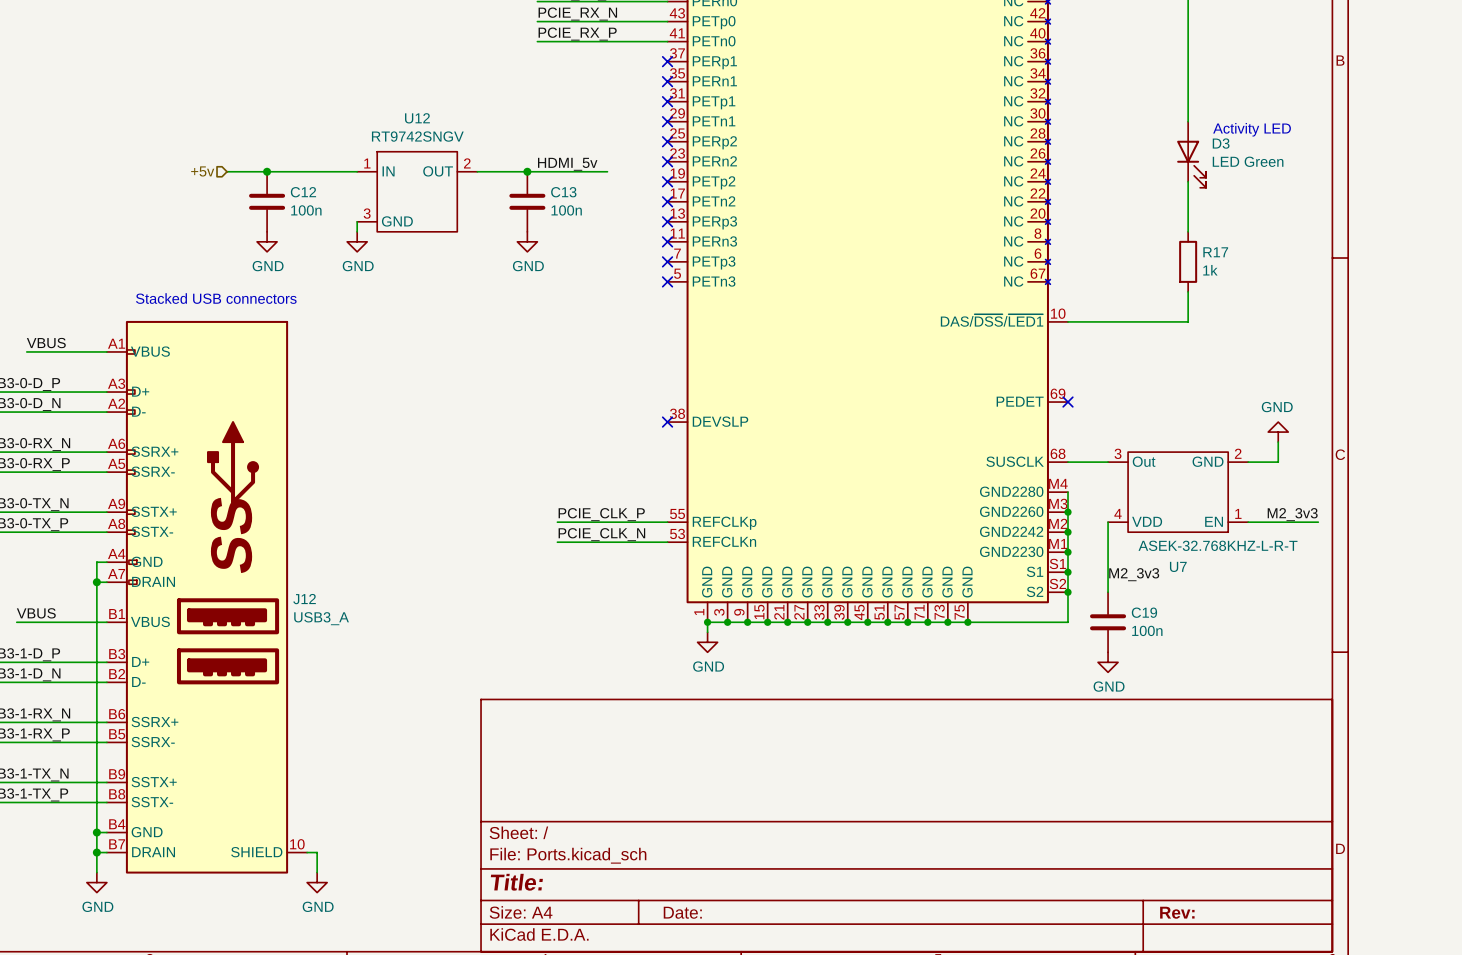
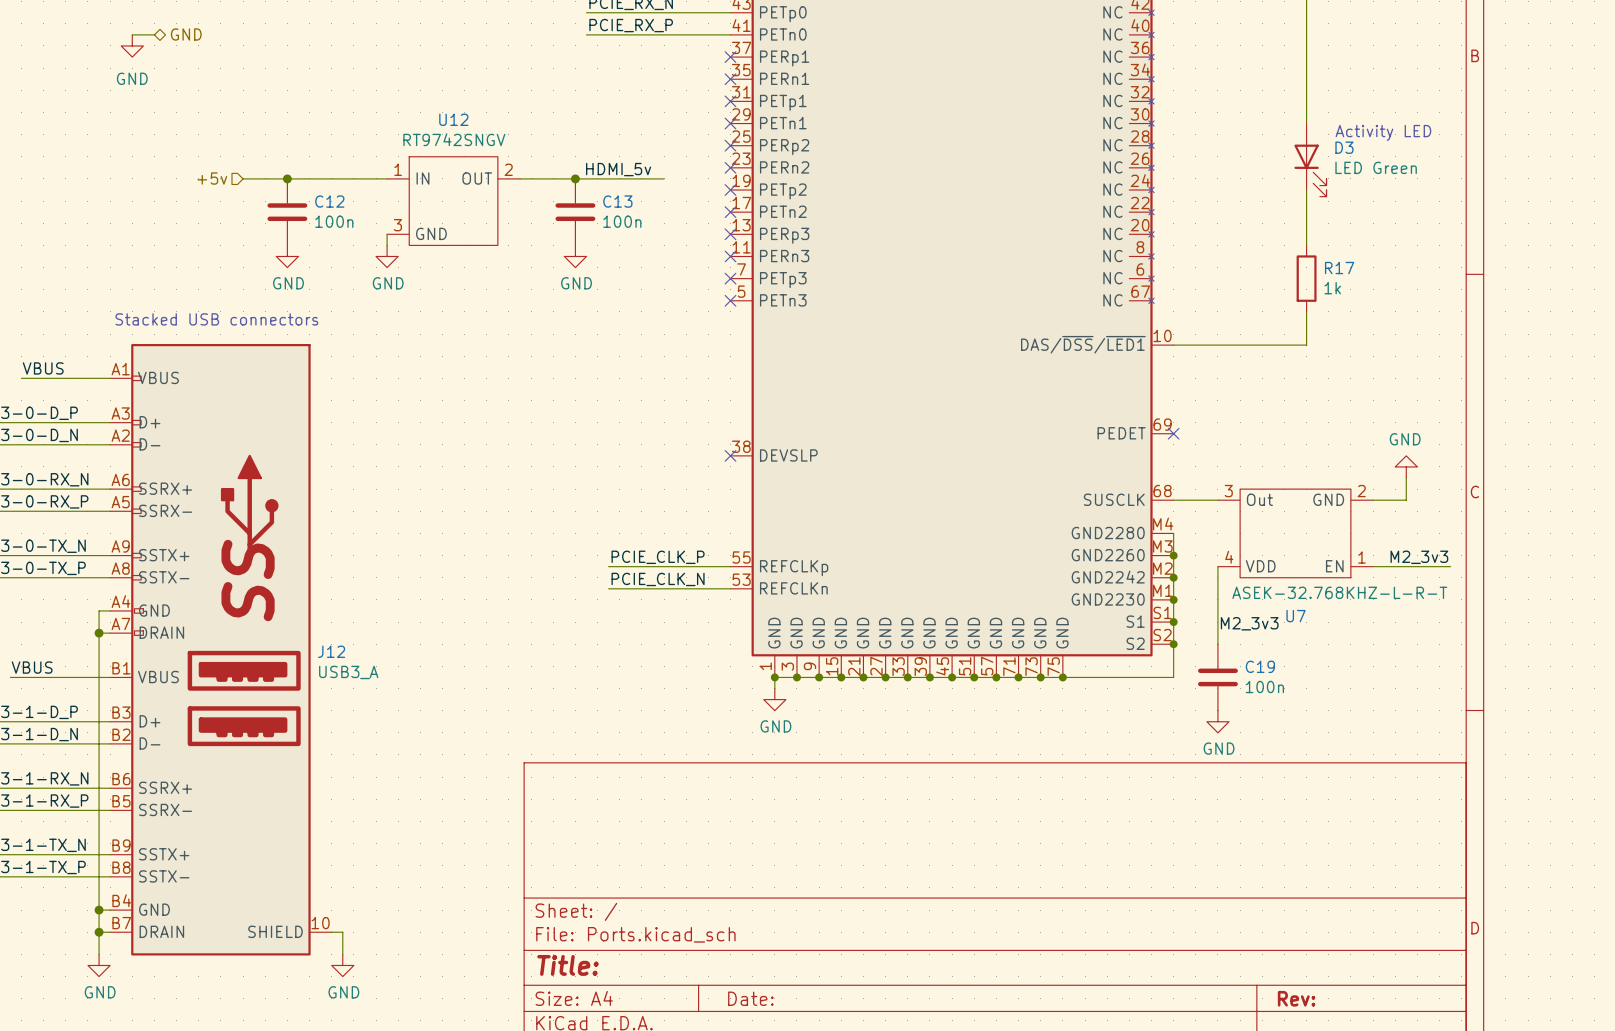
wire: none -> (132, 34) (154, 34)
hierarchical label: none -> GND (186, 34)
power symbol: none -> GND (132, 45)

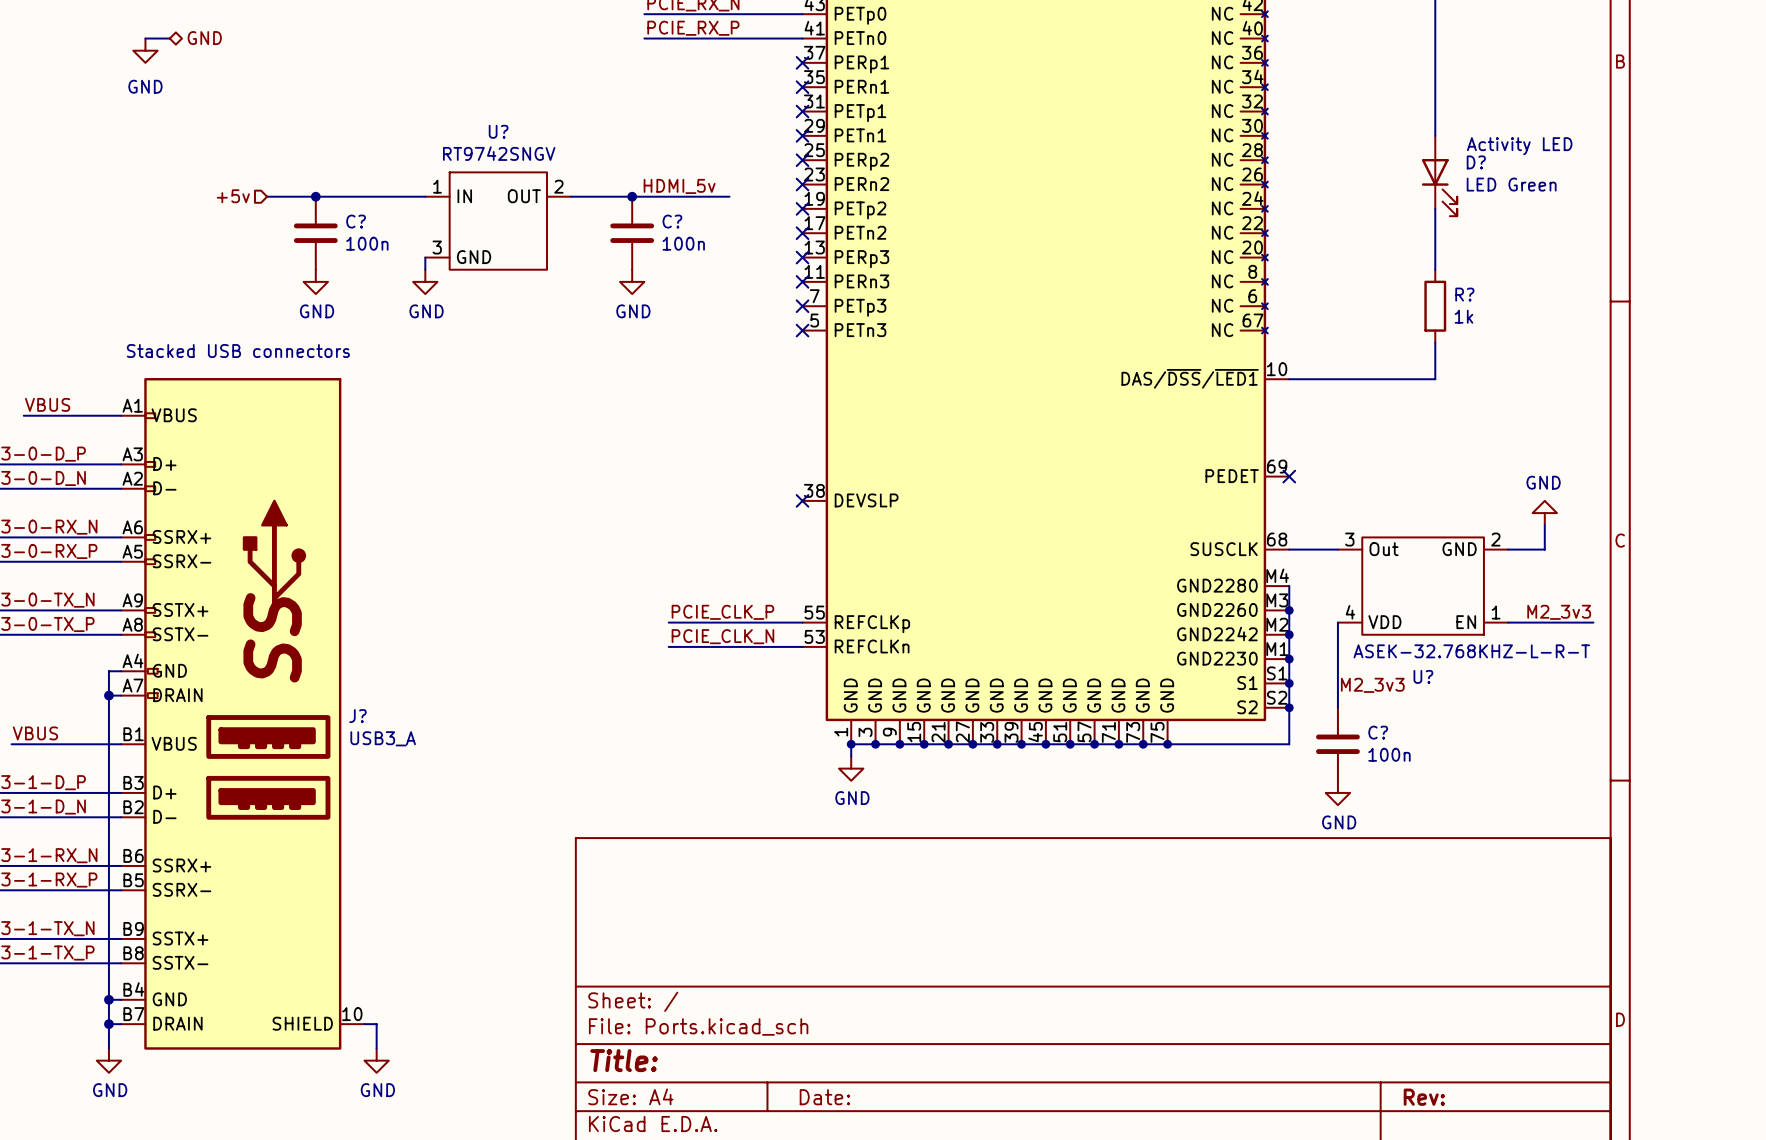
U12 name: U12 (453, 119) -> U? (498, 131)
D3 name: D3 (1344, 147) -> D? (1476, 162)
C12 name: C12 (329, 201) -> C? (356, 221)
C13 name: C13 (617, 201) -> C? (672, 221)
R17 name: R17 (1339, 268) -> R? (1464, 294)
U7 name: U7 (1296, 616) -> U? (1423, 676)
J12 name: J12 (331, 651) -> J? (357, 716)
C19 name: C19 (1260, 666) -> C? (1378, 732)

